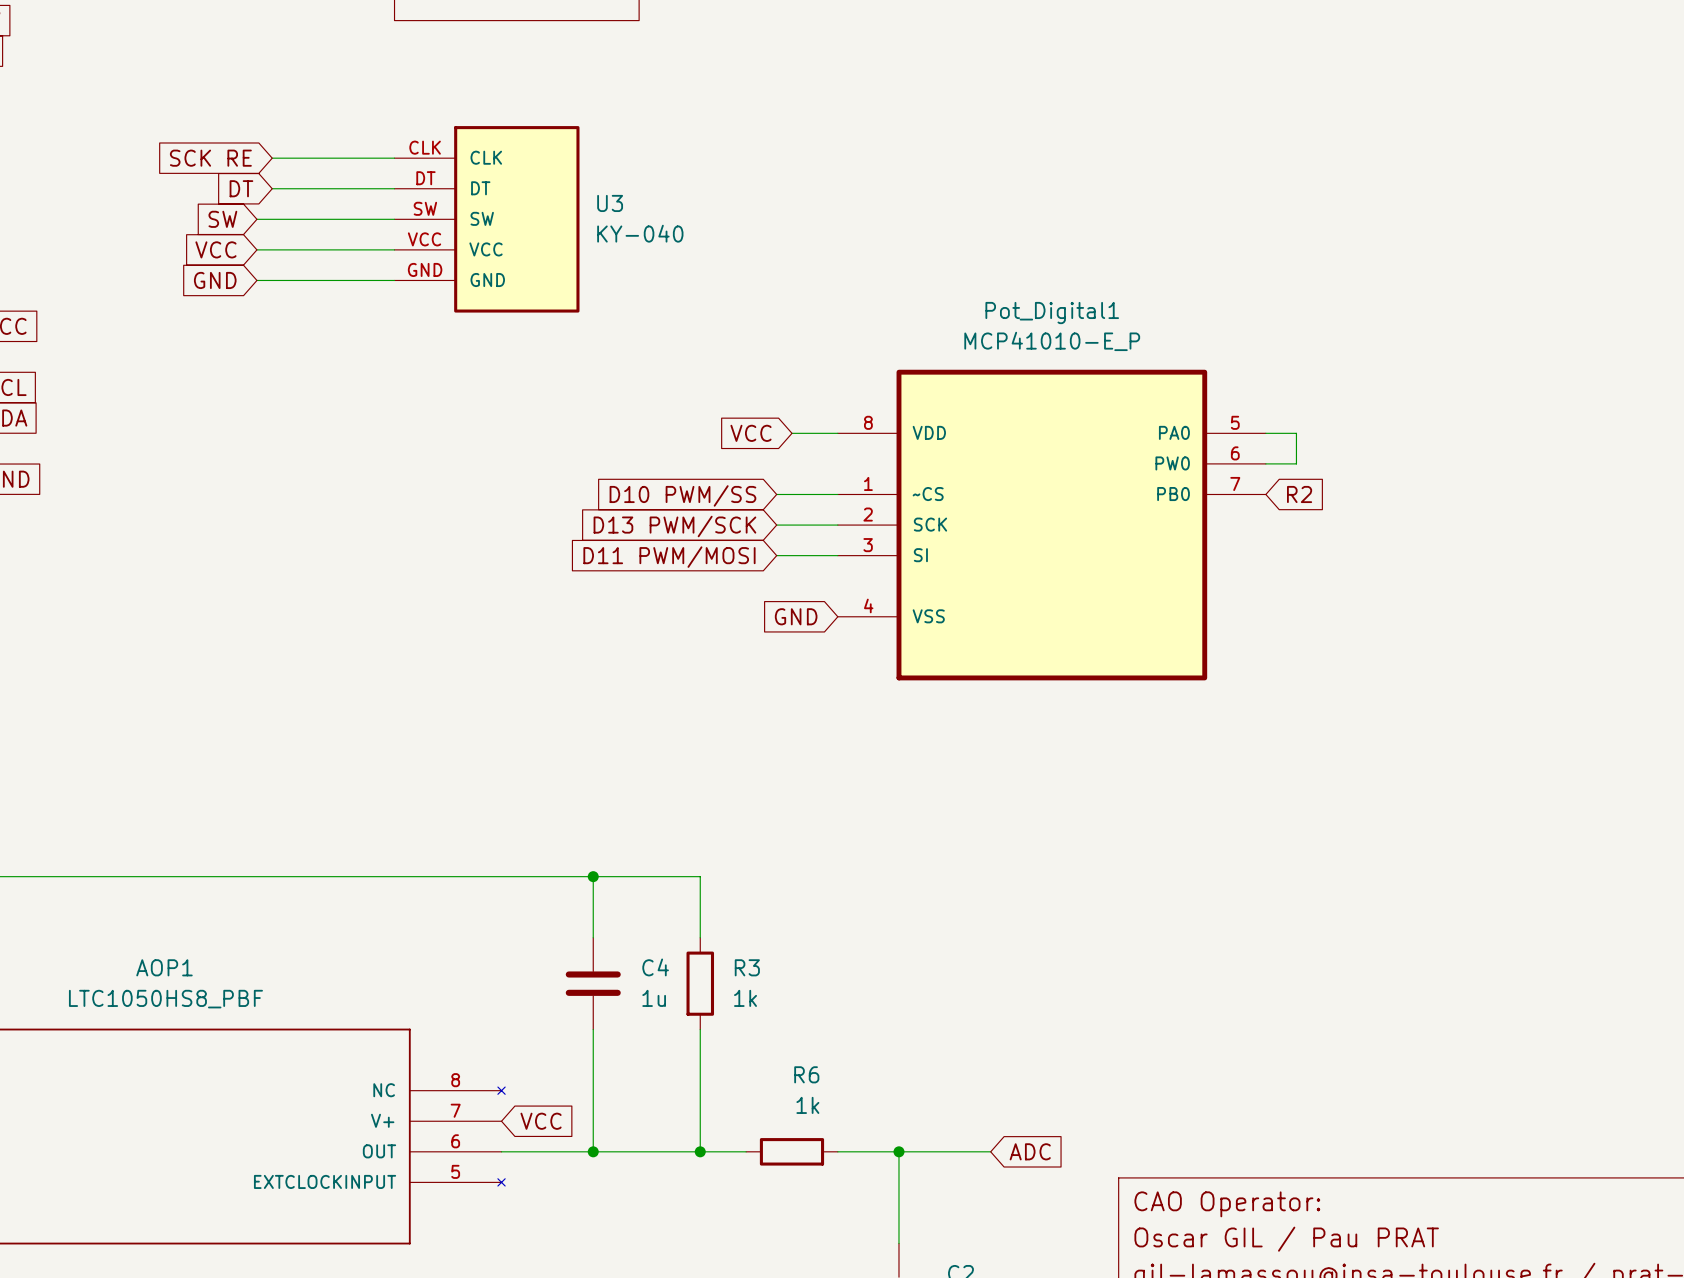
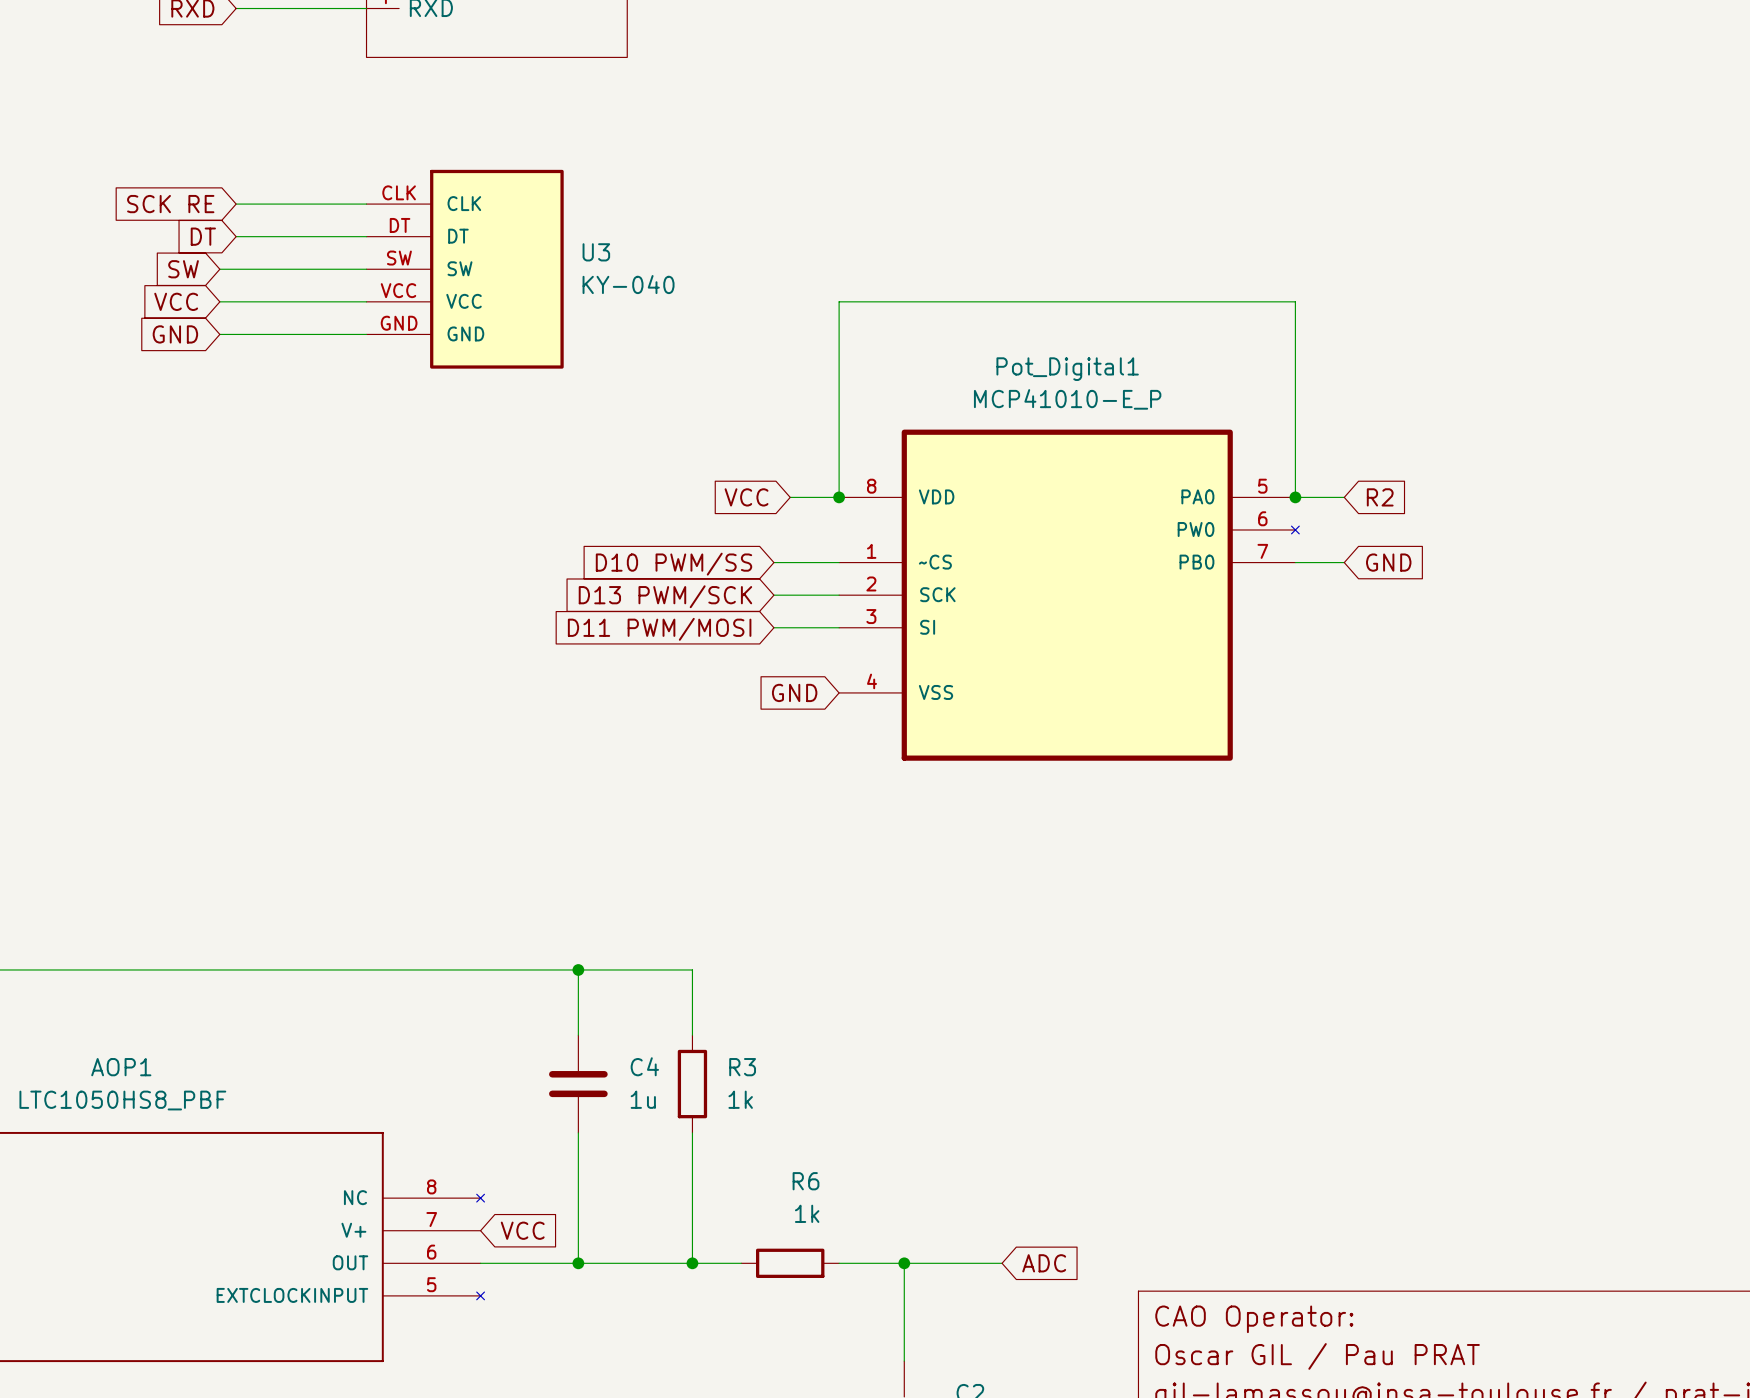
Pot_Digital1 symbol: [837, 369, 1266, 681] -> [839, 429, 1300, 761]
wire: none -> (839, 497) (839, 301) (1295, 301) (1295, 497)
junction: none -> (839, 497)
junction: none -> (1295, 497)
wire: (1296, 433) (1296, 463) (1265, 463) -> (1327, 497) (1344, 497)
wire: none -> (1295, 562) (1344, 562)
global label position: R2 (1299, 494) -> R2 (1380, 497)
global label: none -> GND (1388, 562)

